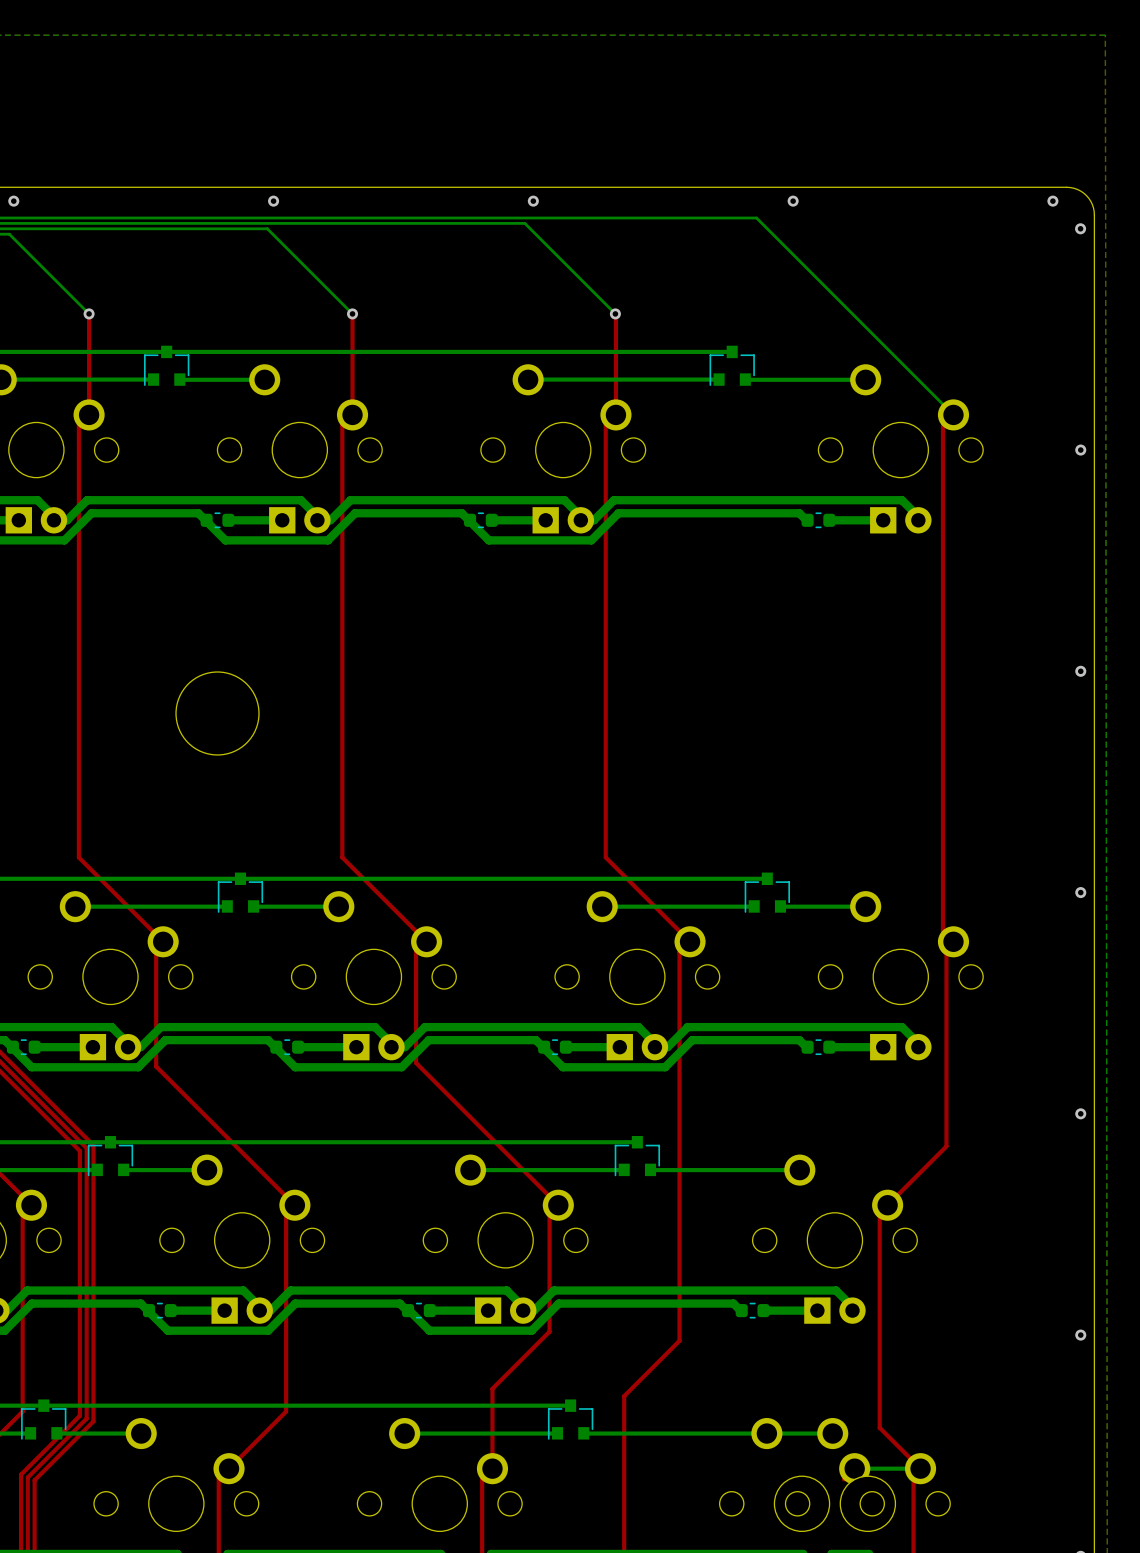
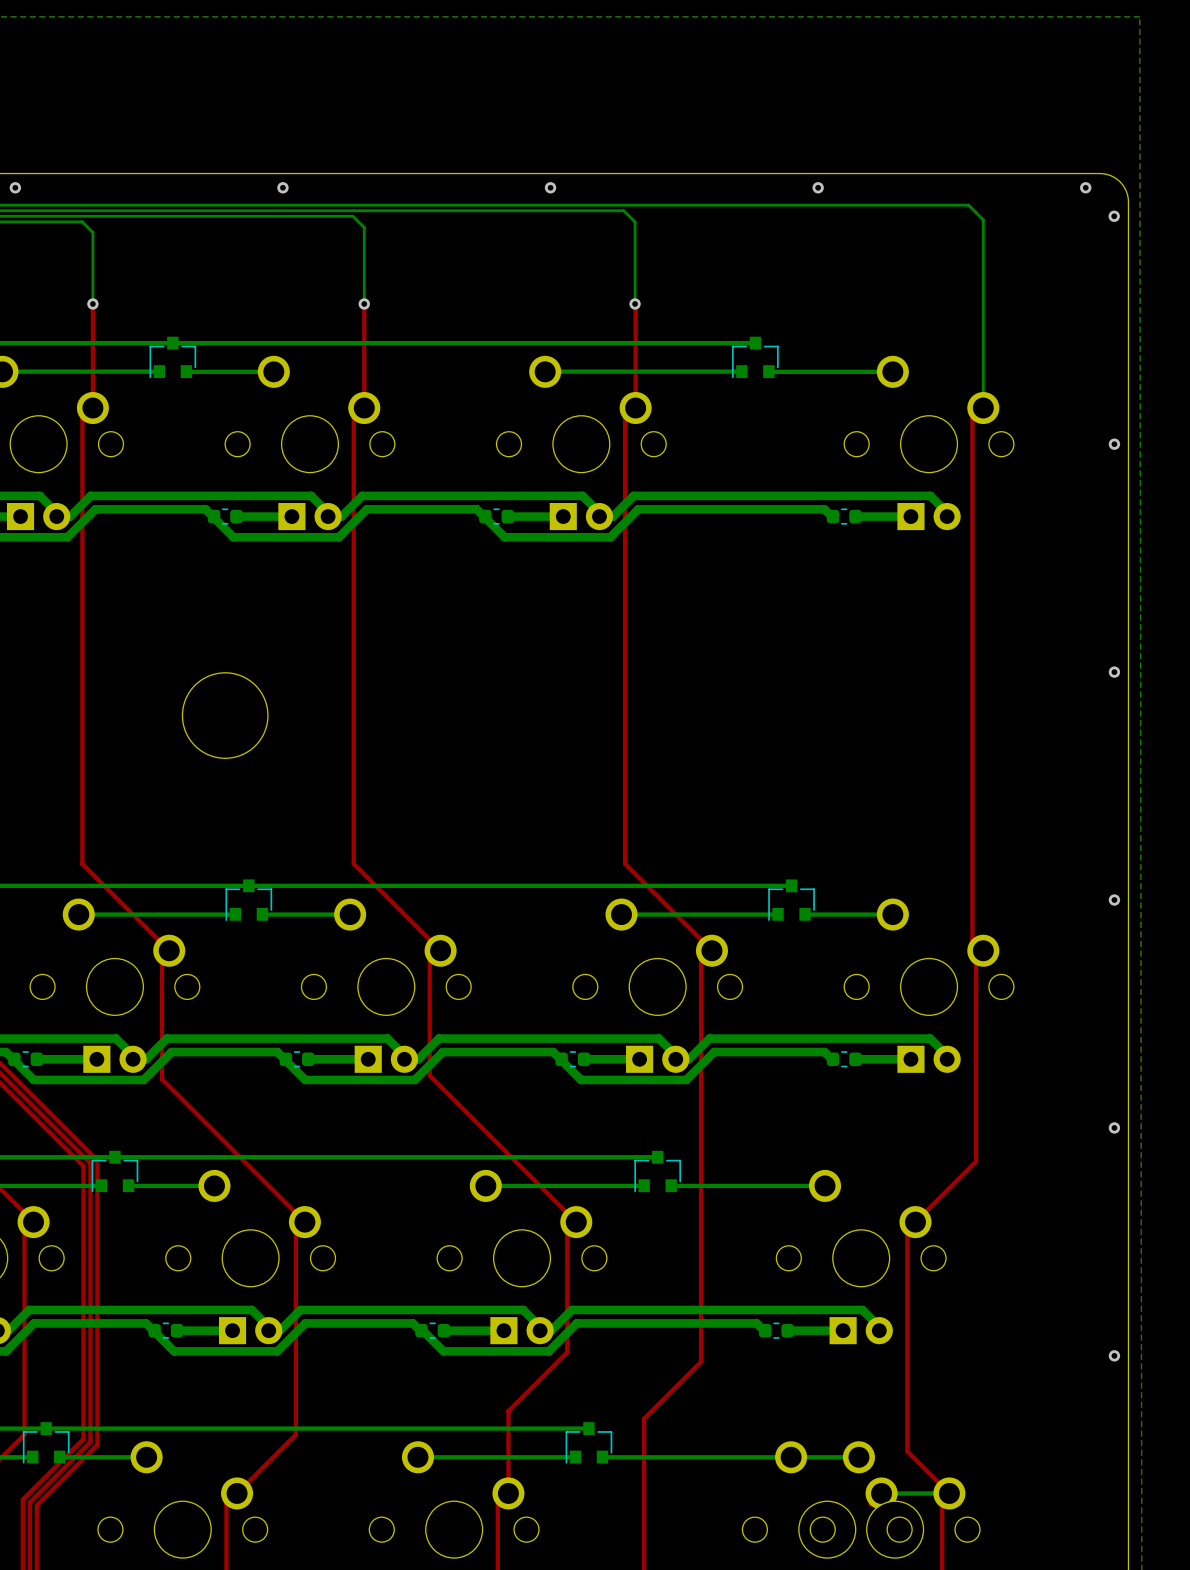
bottom track: (756, 218) (953, 414) -> (780, 205) (968, 205) (983, 219) (983, 408)
bottom track: (524, 223) (615, 313) -> (541, 210) (623, 210) (635, 222) (635, 303)
bottom track: (267, 228) (352, 313) -> (276, 216) (352, 216) (364, 227) (364, 303)
bottom track: (9, 234) (89, 313) -> (10, 221) (82, 221) (92, 232) (92, 303)

